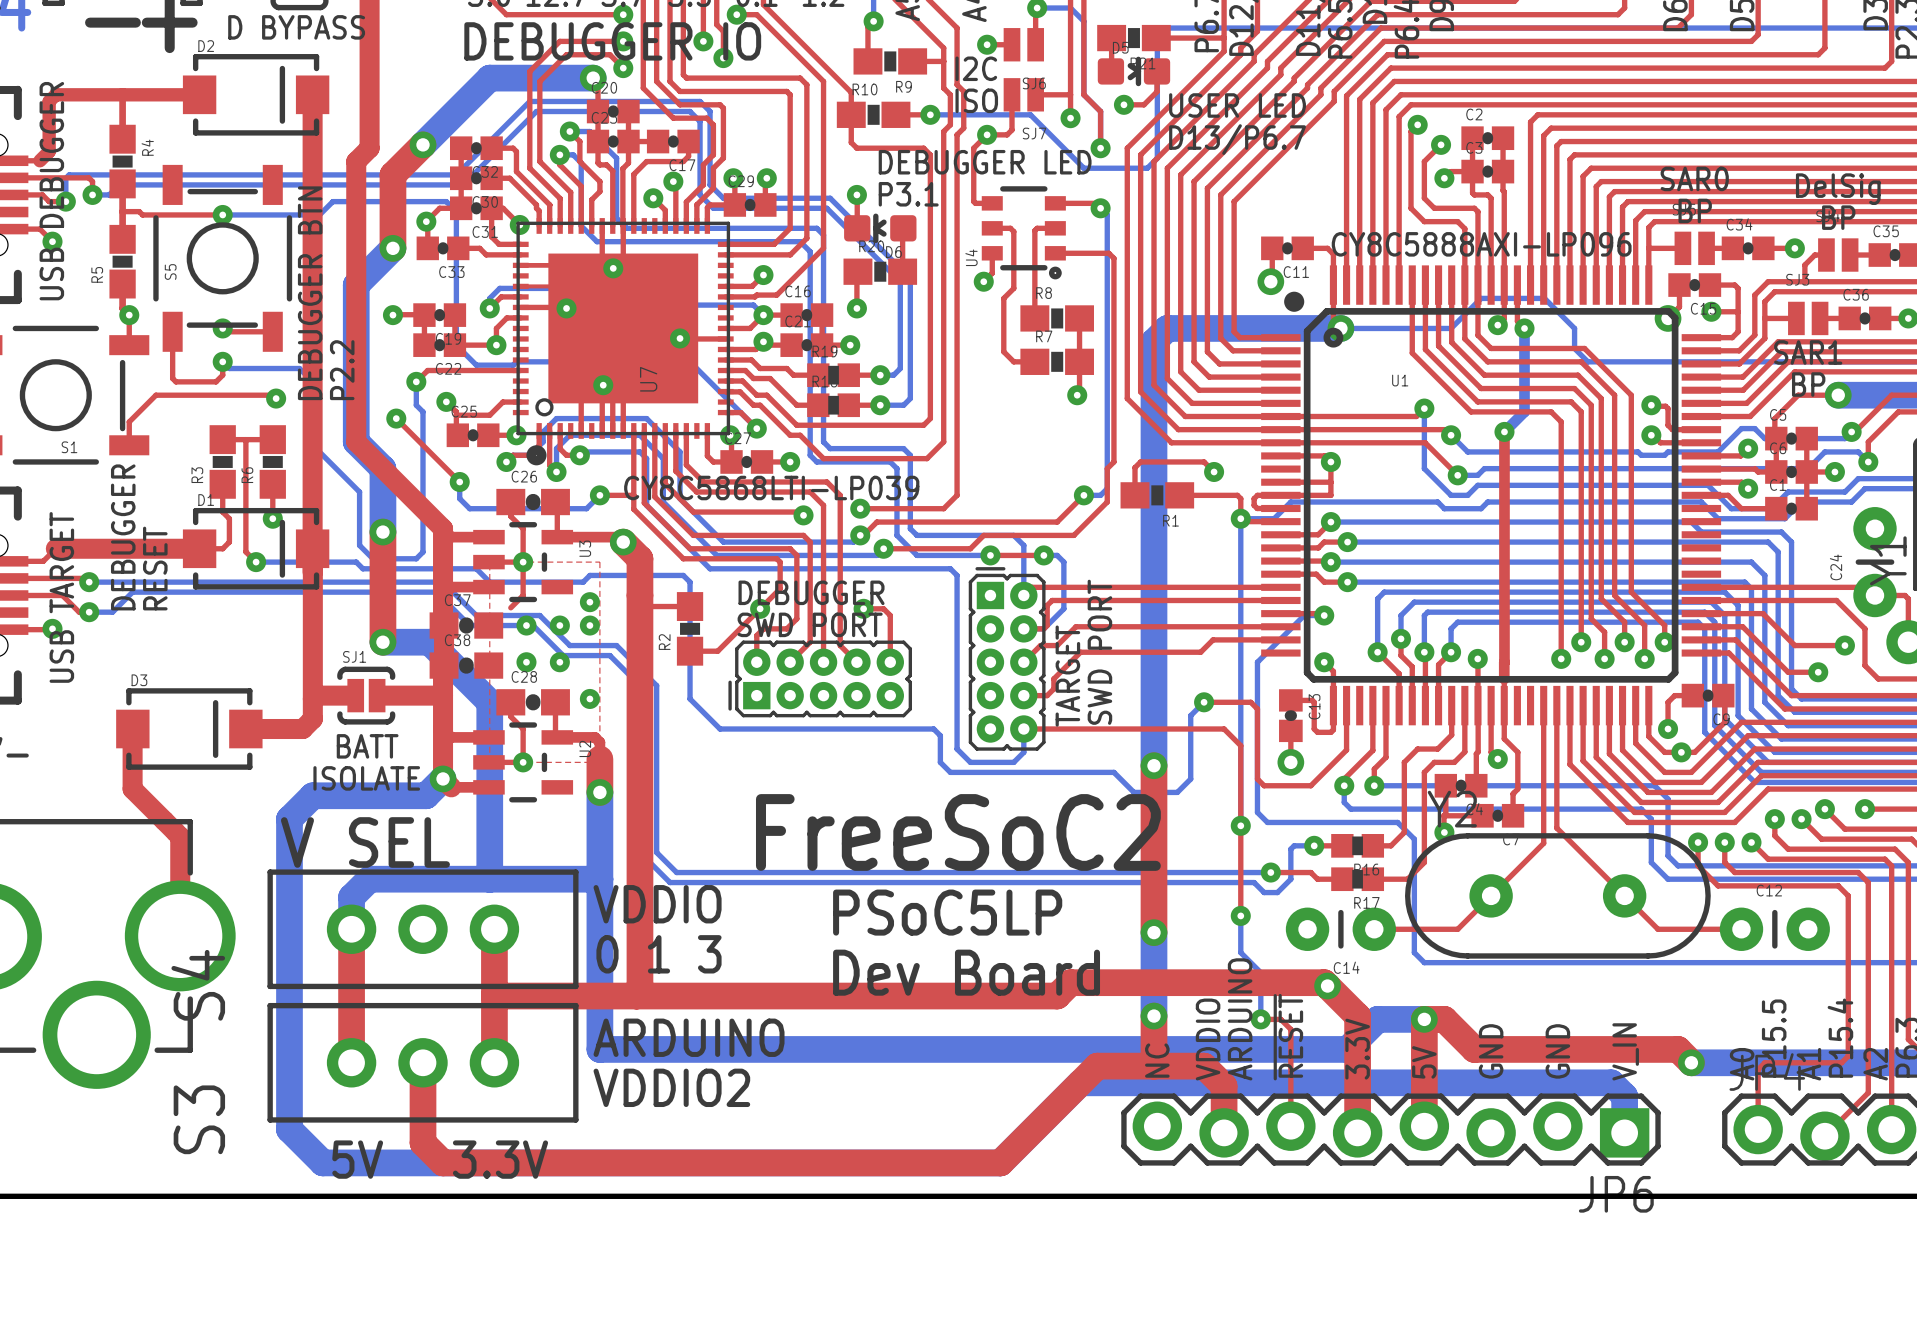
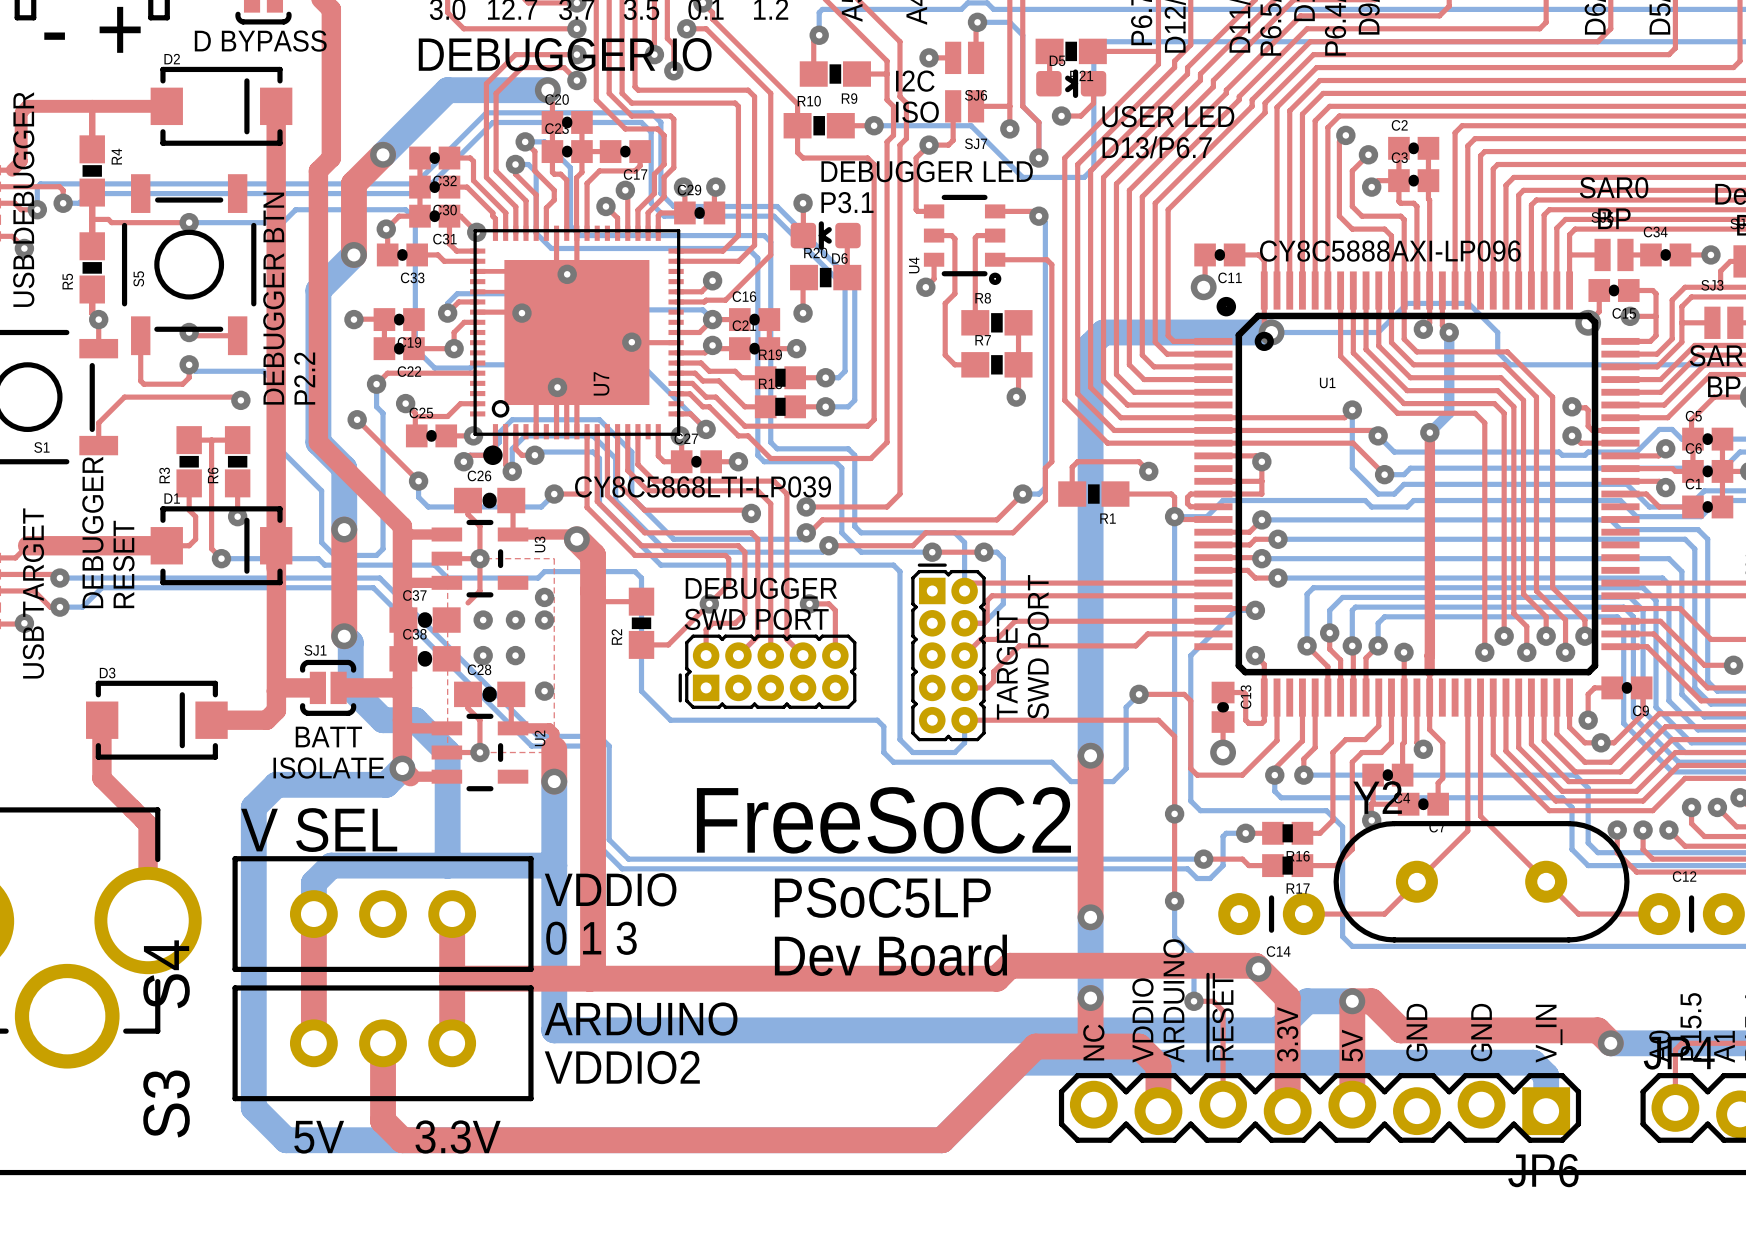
bottom track: (419, 582) (443, 582) (476, 615) (539, 615) (569, 645) (616, 645) (656, 685) (656, 755) -> (379, 578) (538, 736) (599, 736) (609, 746)
bottom track: (412, 592) (436, 592) (469, 625) (533, 625) (563, 655) (609, 655) (646, 692) (646, 765) -> (373, 587) (531, 746) (589, 746) (599, 755)
bottom track: (382, 642) (429, 642) (489, 702) (489, 762) -> (344, 636) (350, 642) (350, 687) (383, 720) (415, 720) (447, 752)

